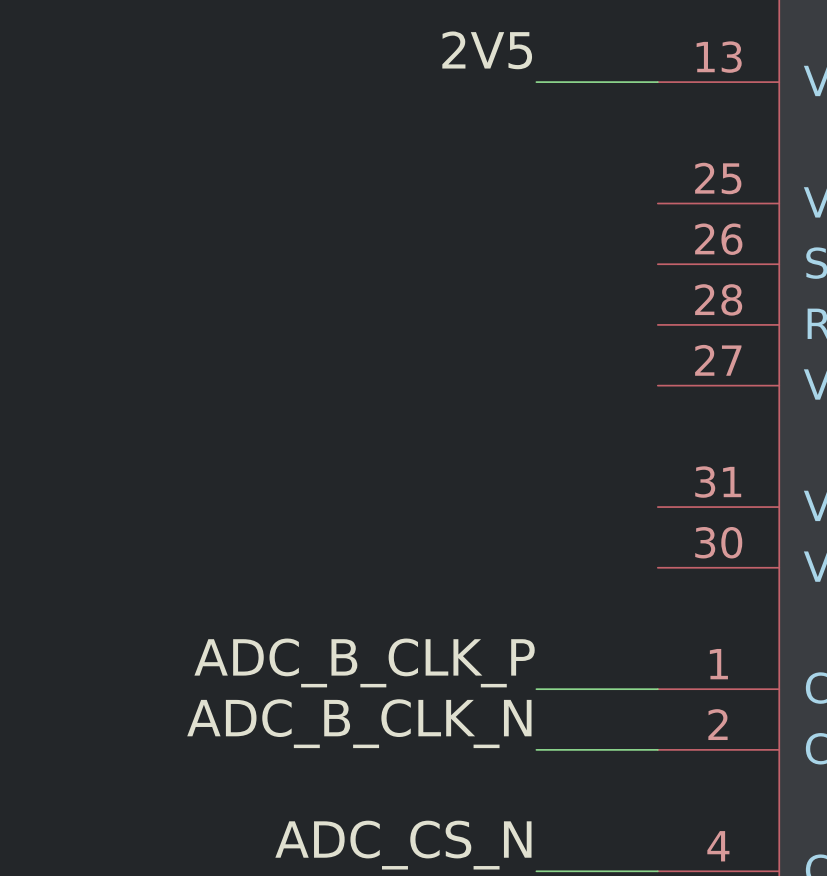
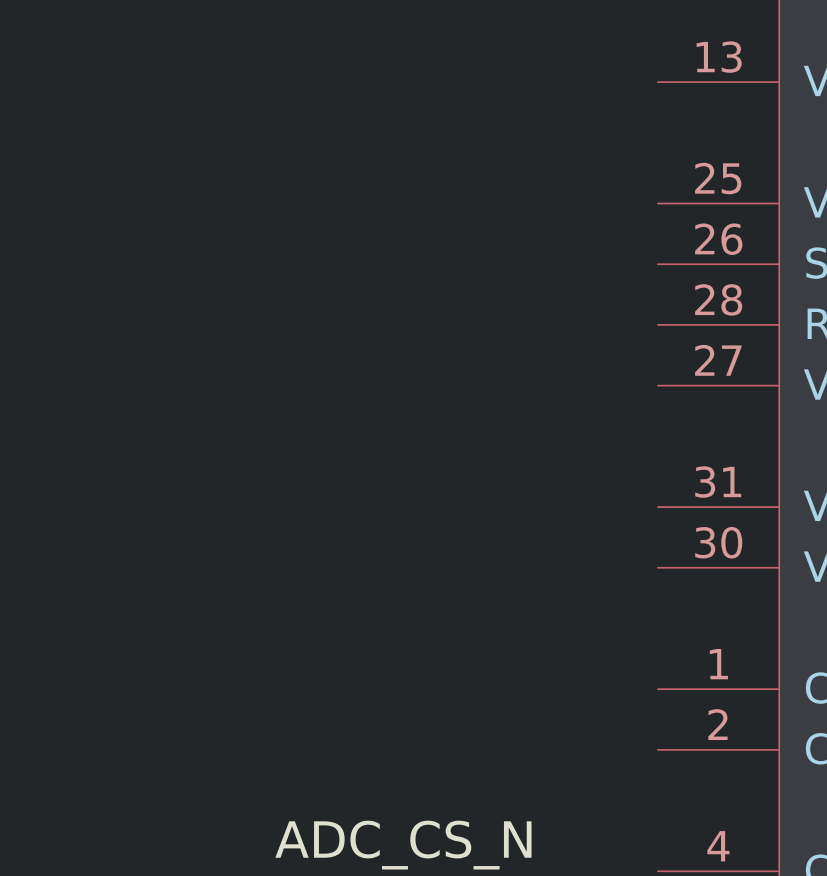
label: 2V5 (487, 50) -> none
wire: (536, 82) (657, 82) -> none
label: ADC_B_CLK_P (364, 662) -> none
wire: (536, 689) (657, 689) -> none
label: ADC_B_CLK_N (359, 723) -> none
wire: (536, 749) (657, 749) -> none
wire: (536, 871) (657, 871) -> none

